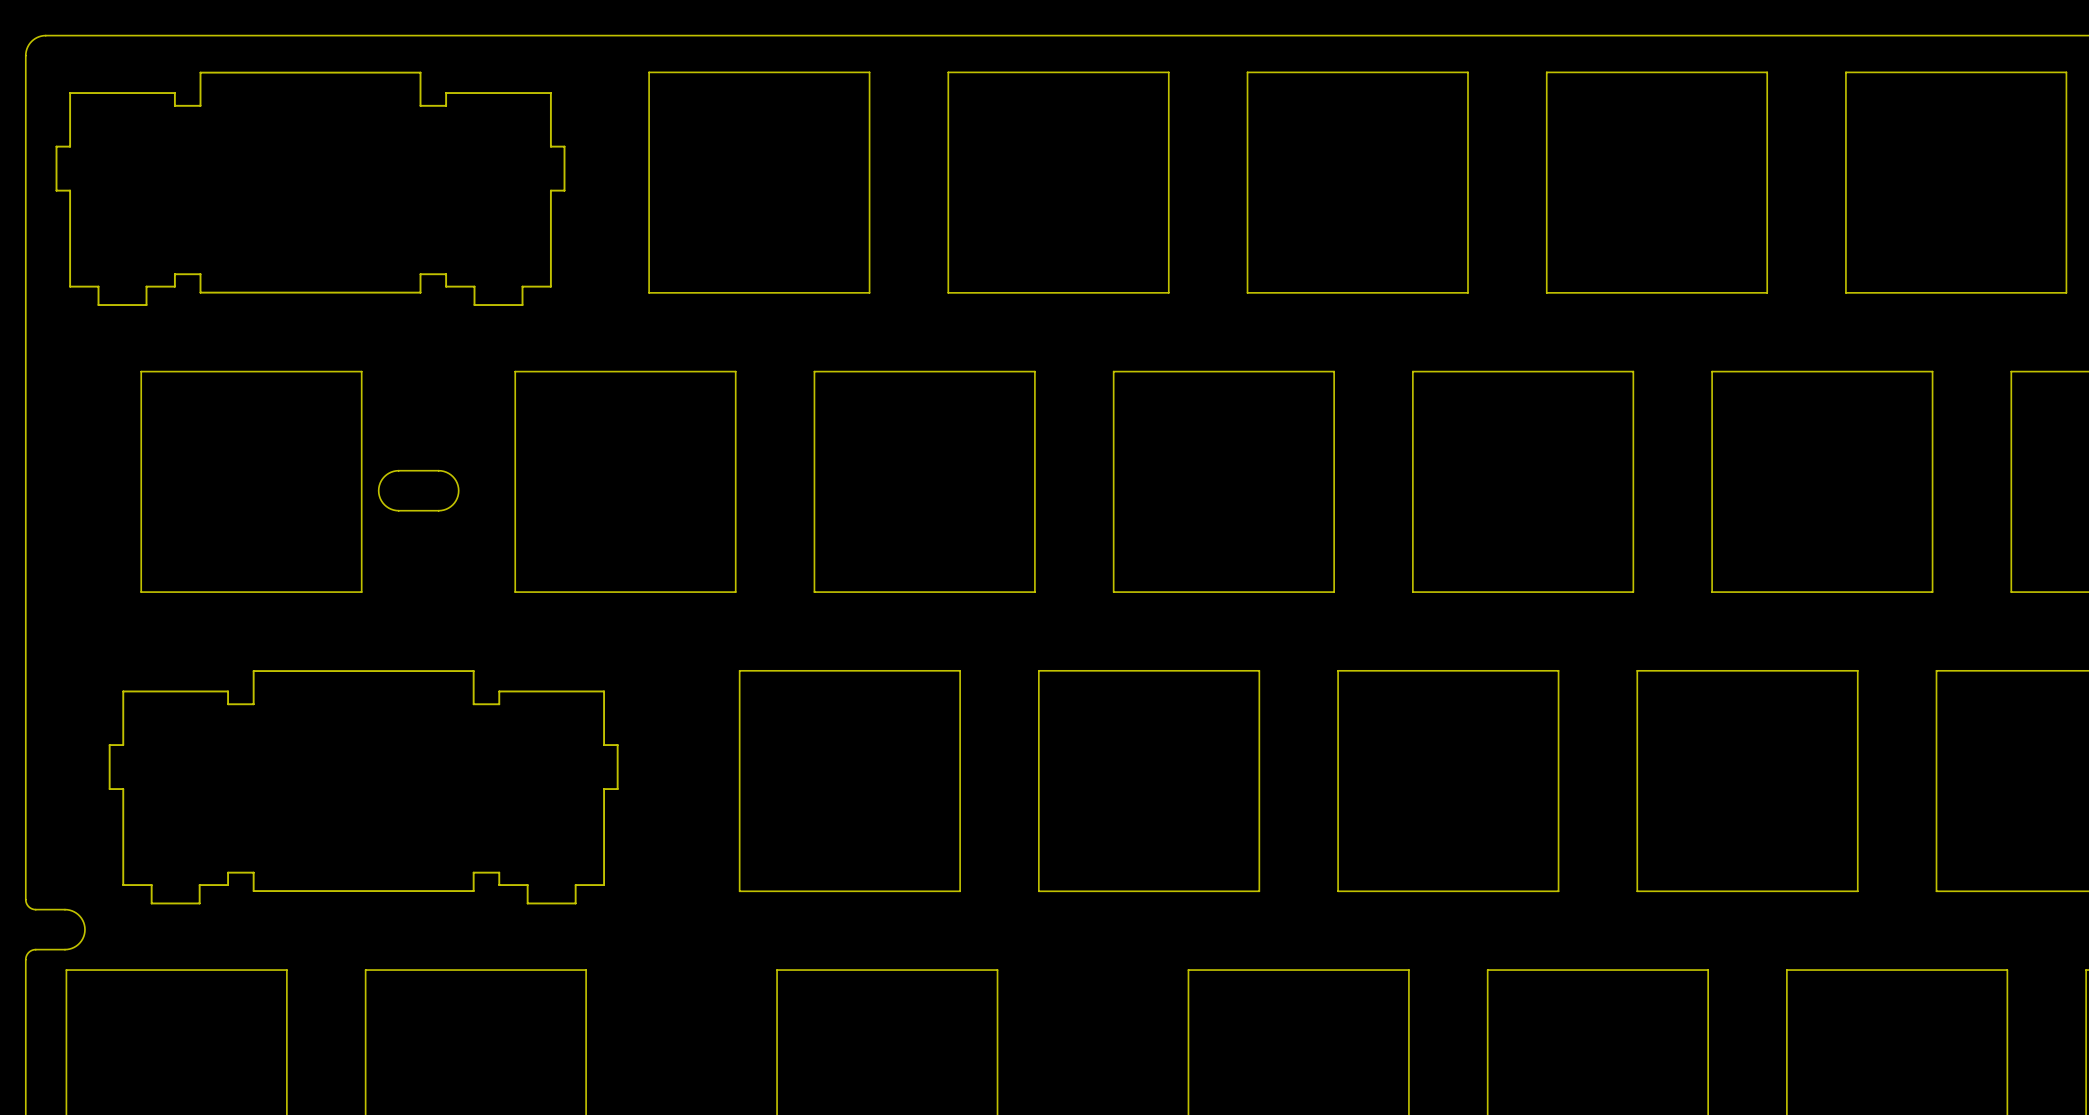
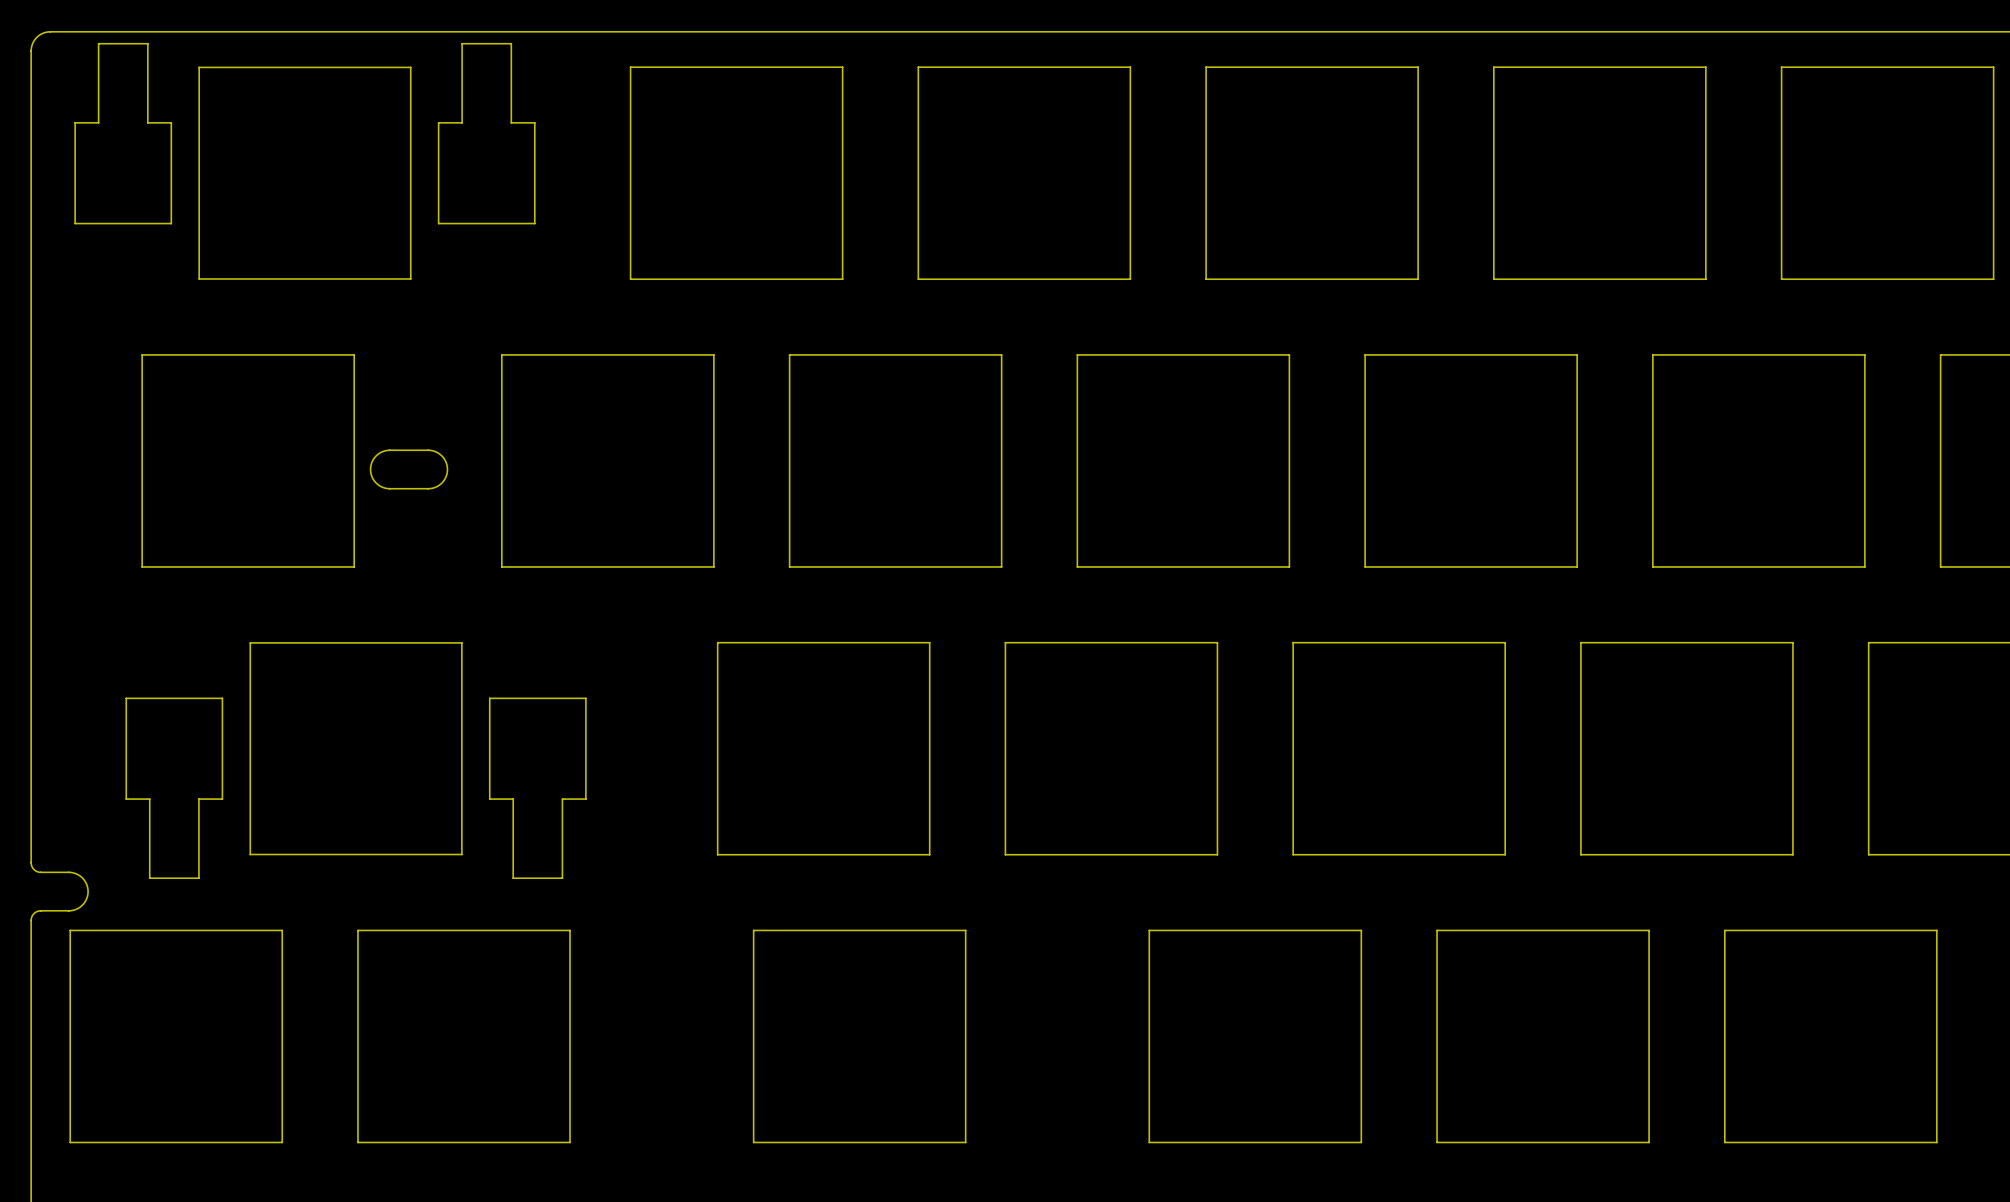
drawing: none -> [74, 43, 536, 280]
drawing: [55, 71, 566, 306] -> none
drawing shape: [108, 670, 619, 905] -> [125, 642, 587, 879]

